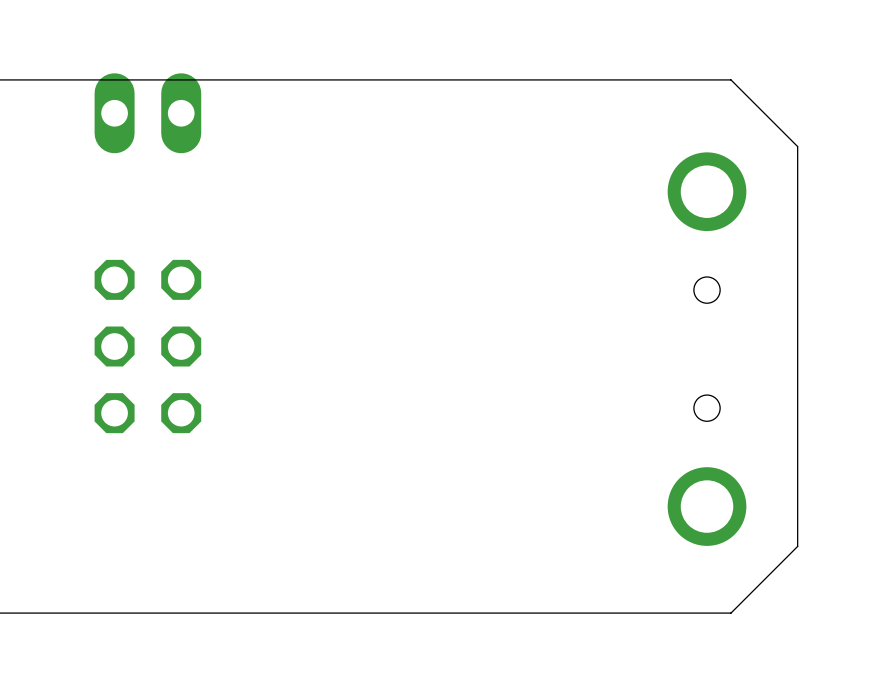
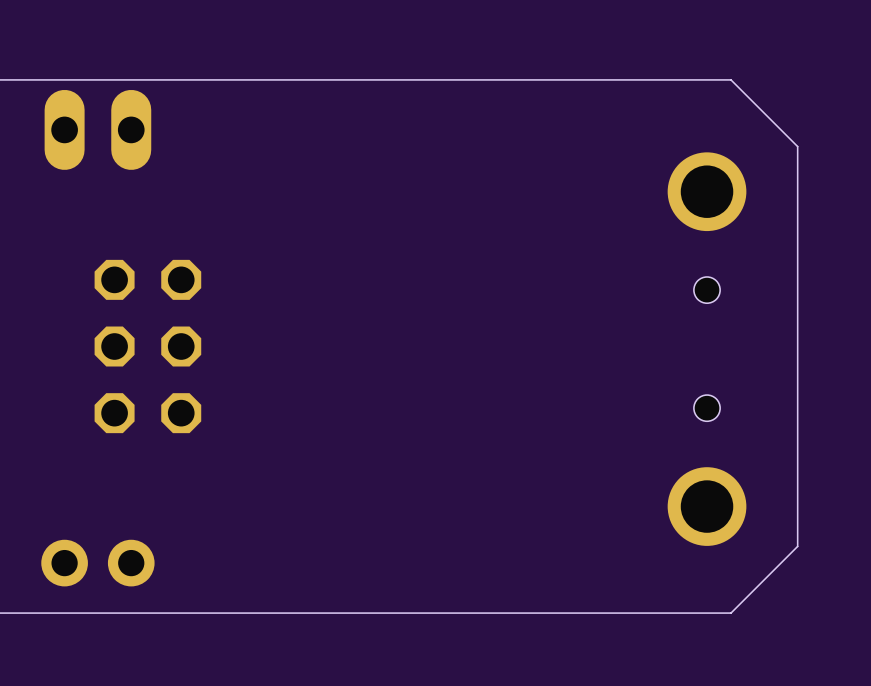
part position: (147, 113) -> (97, 129)
part: none -> (97, 563)

